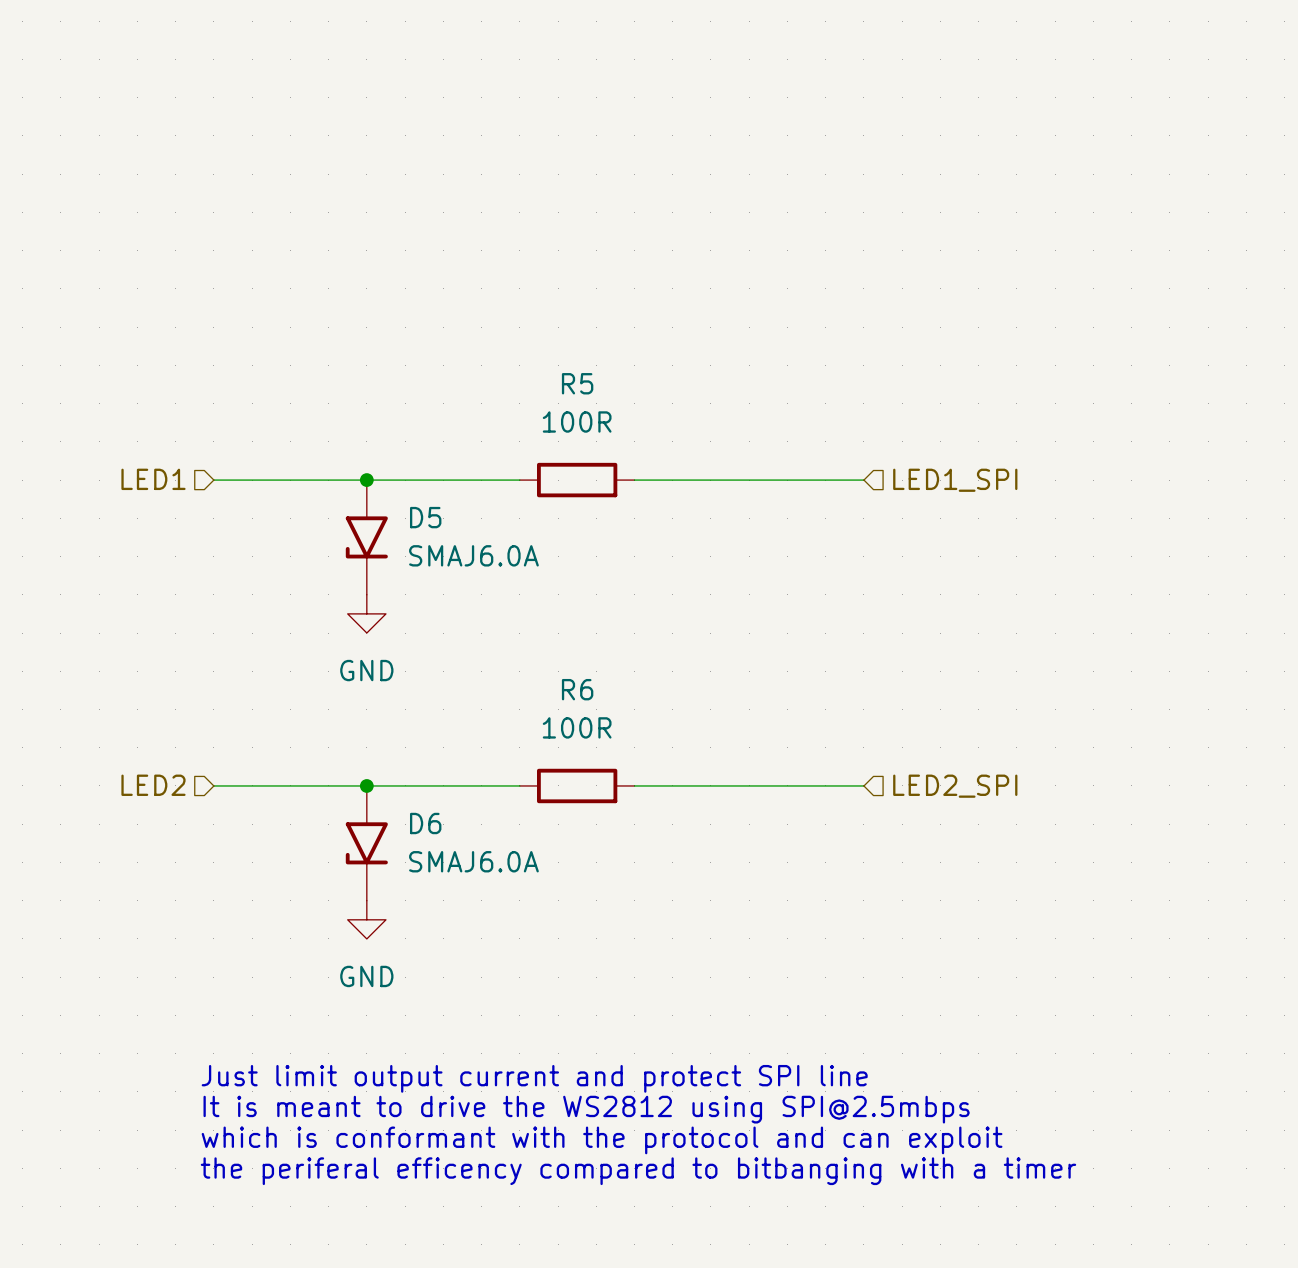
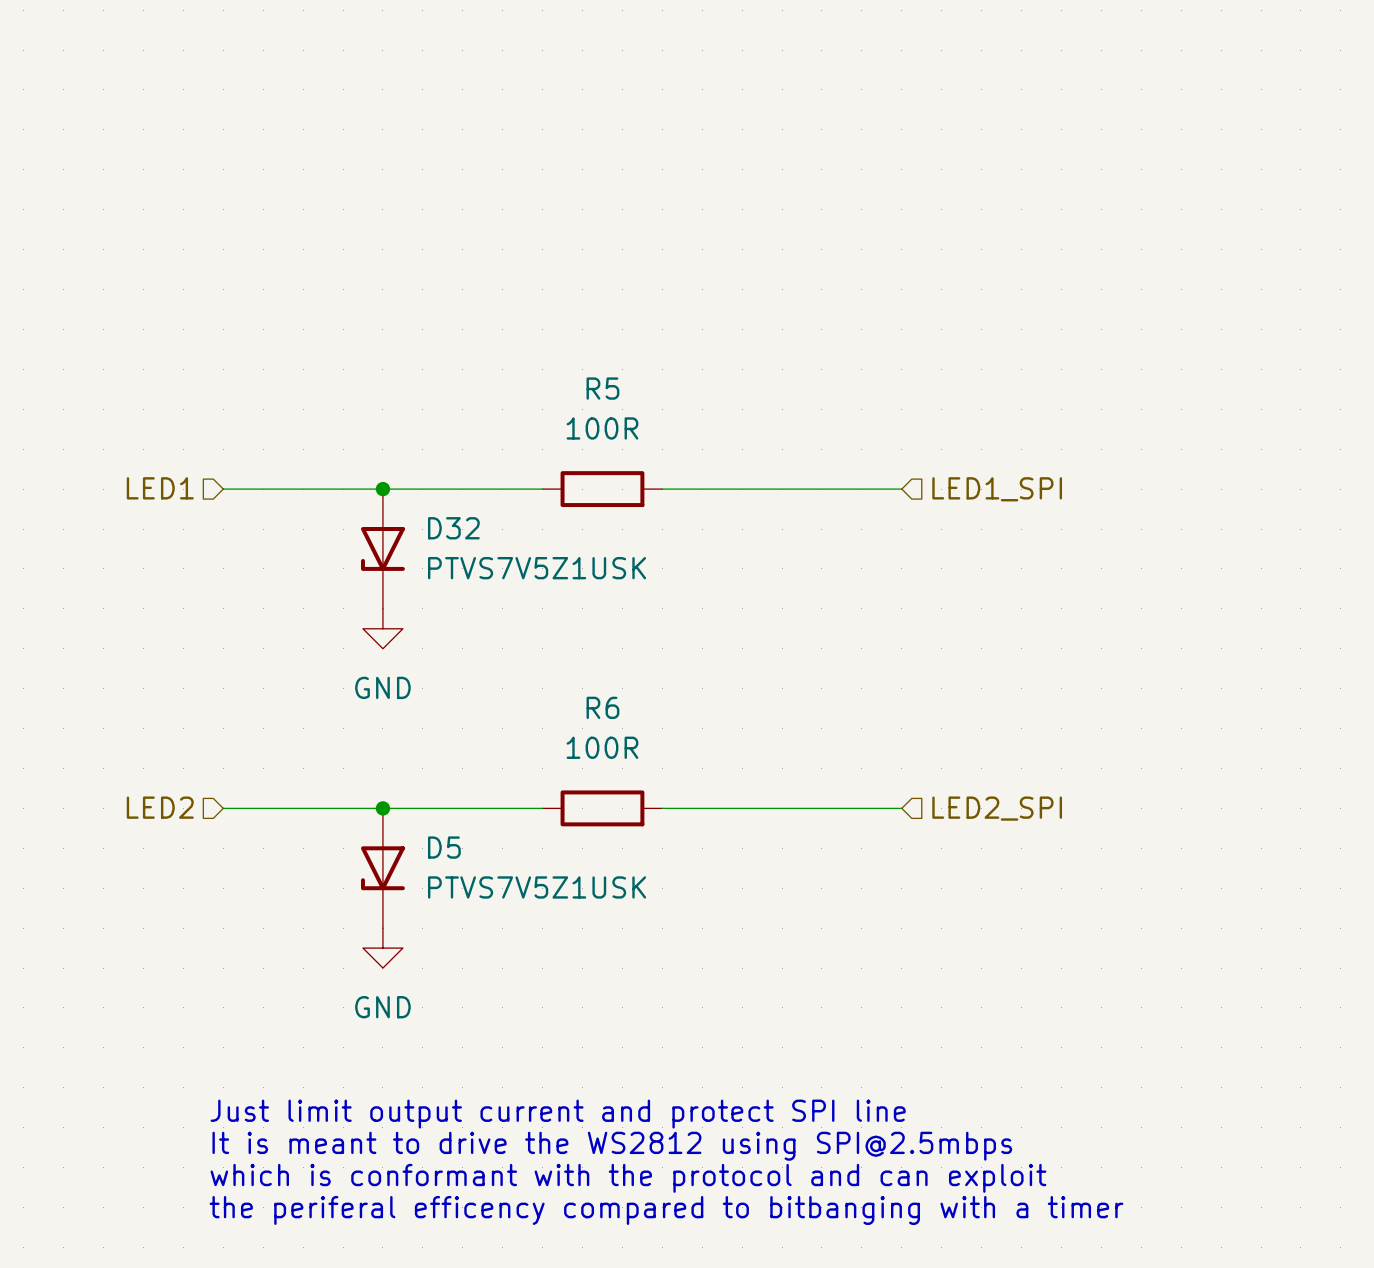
D5 symbol: [345, 480, 388, 595] -> [360, 808, 405, 929]
D32: none -> PTVS7V5Z1USK (382, 548)
D5 value: SMAJ6.0A (473, 555) -> PTVS7V5Z1USK (537, 887)
D6: SMAJ6.0A (366, 843) -> none

